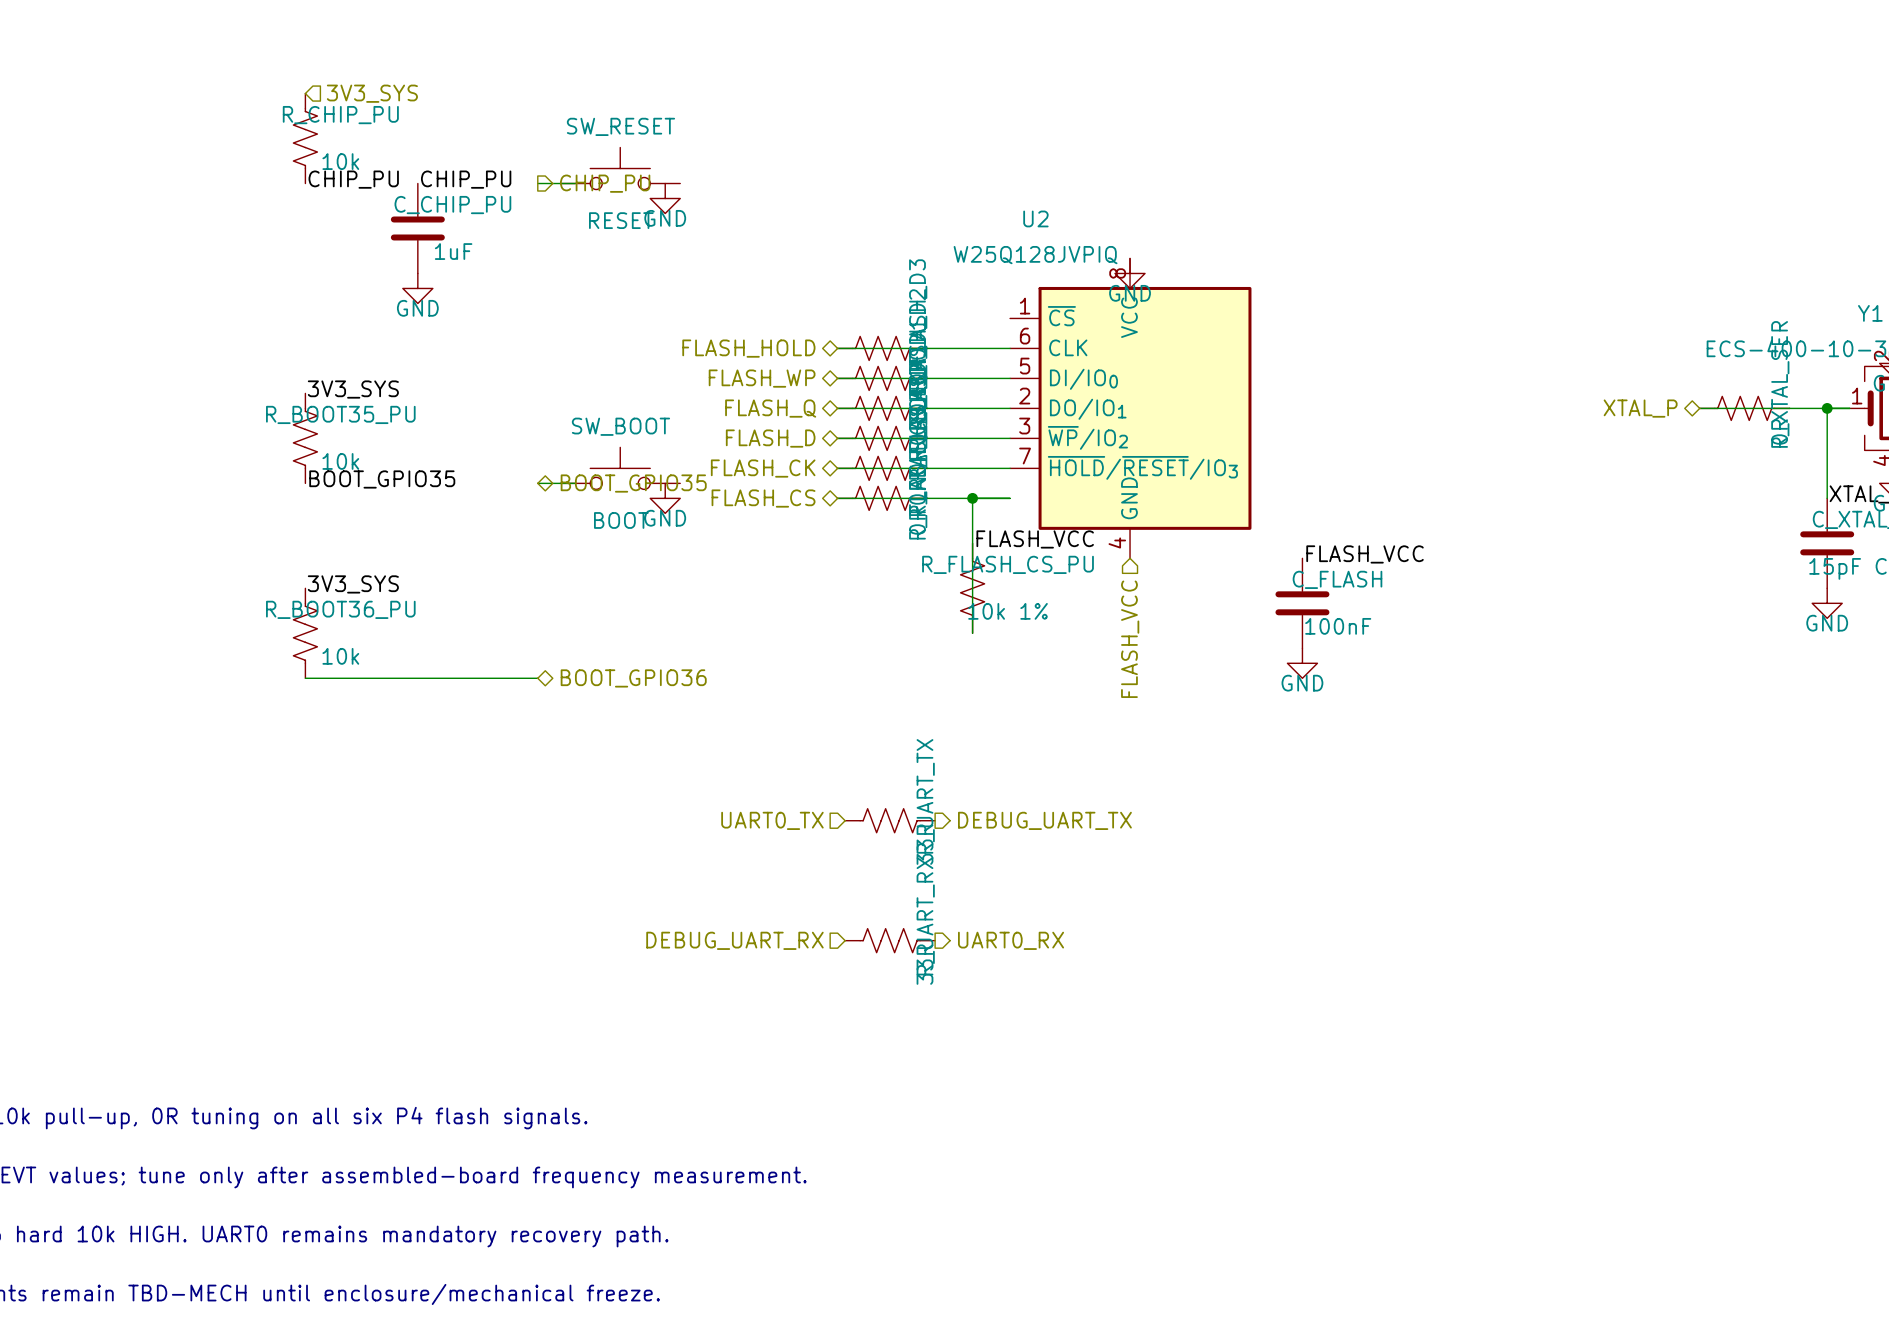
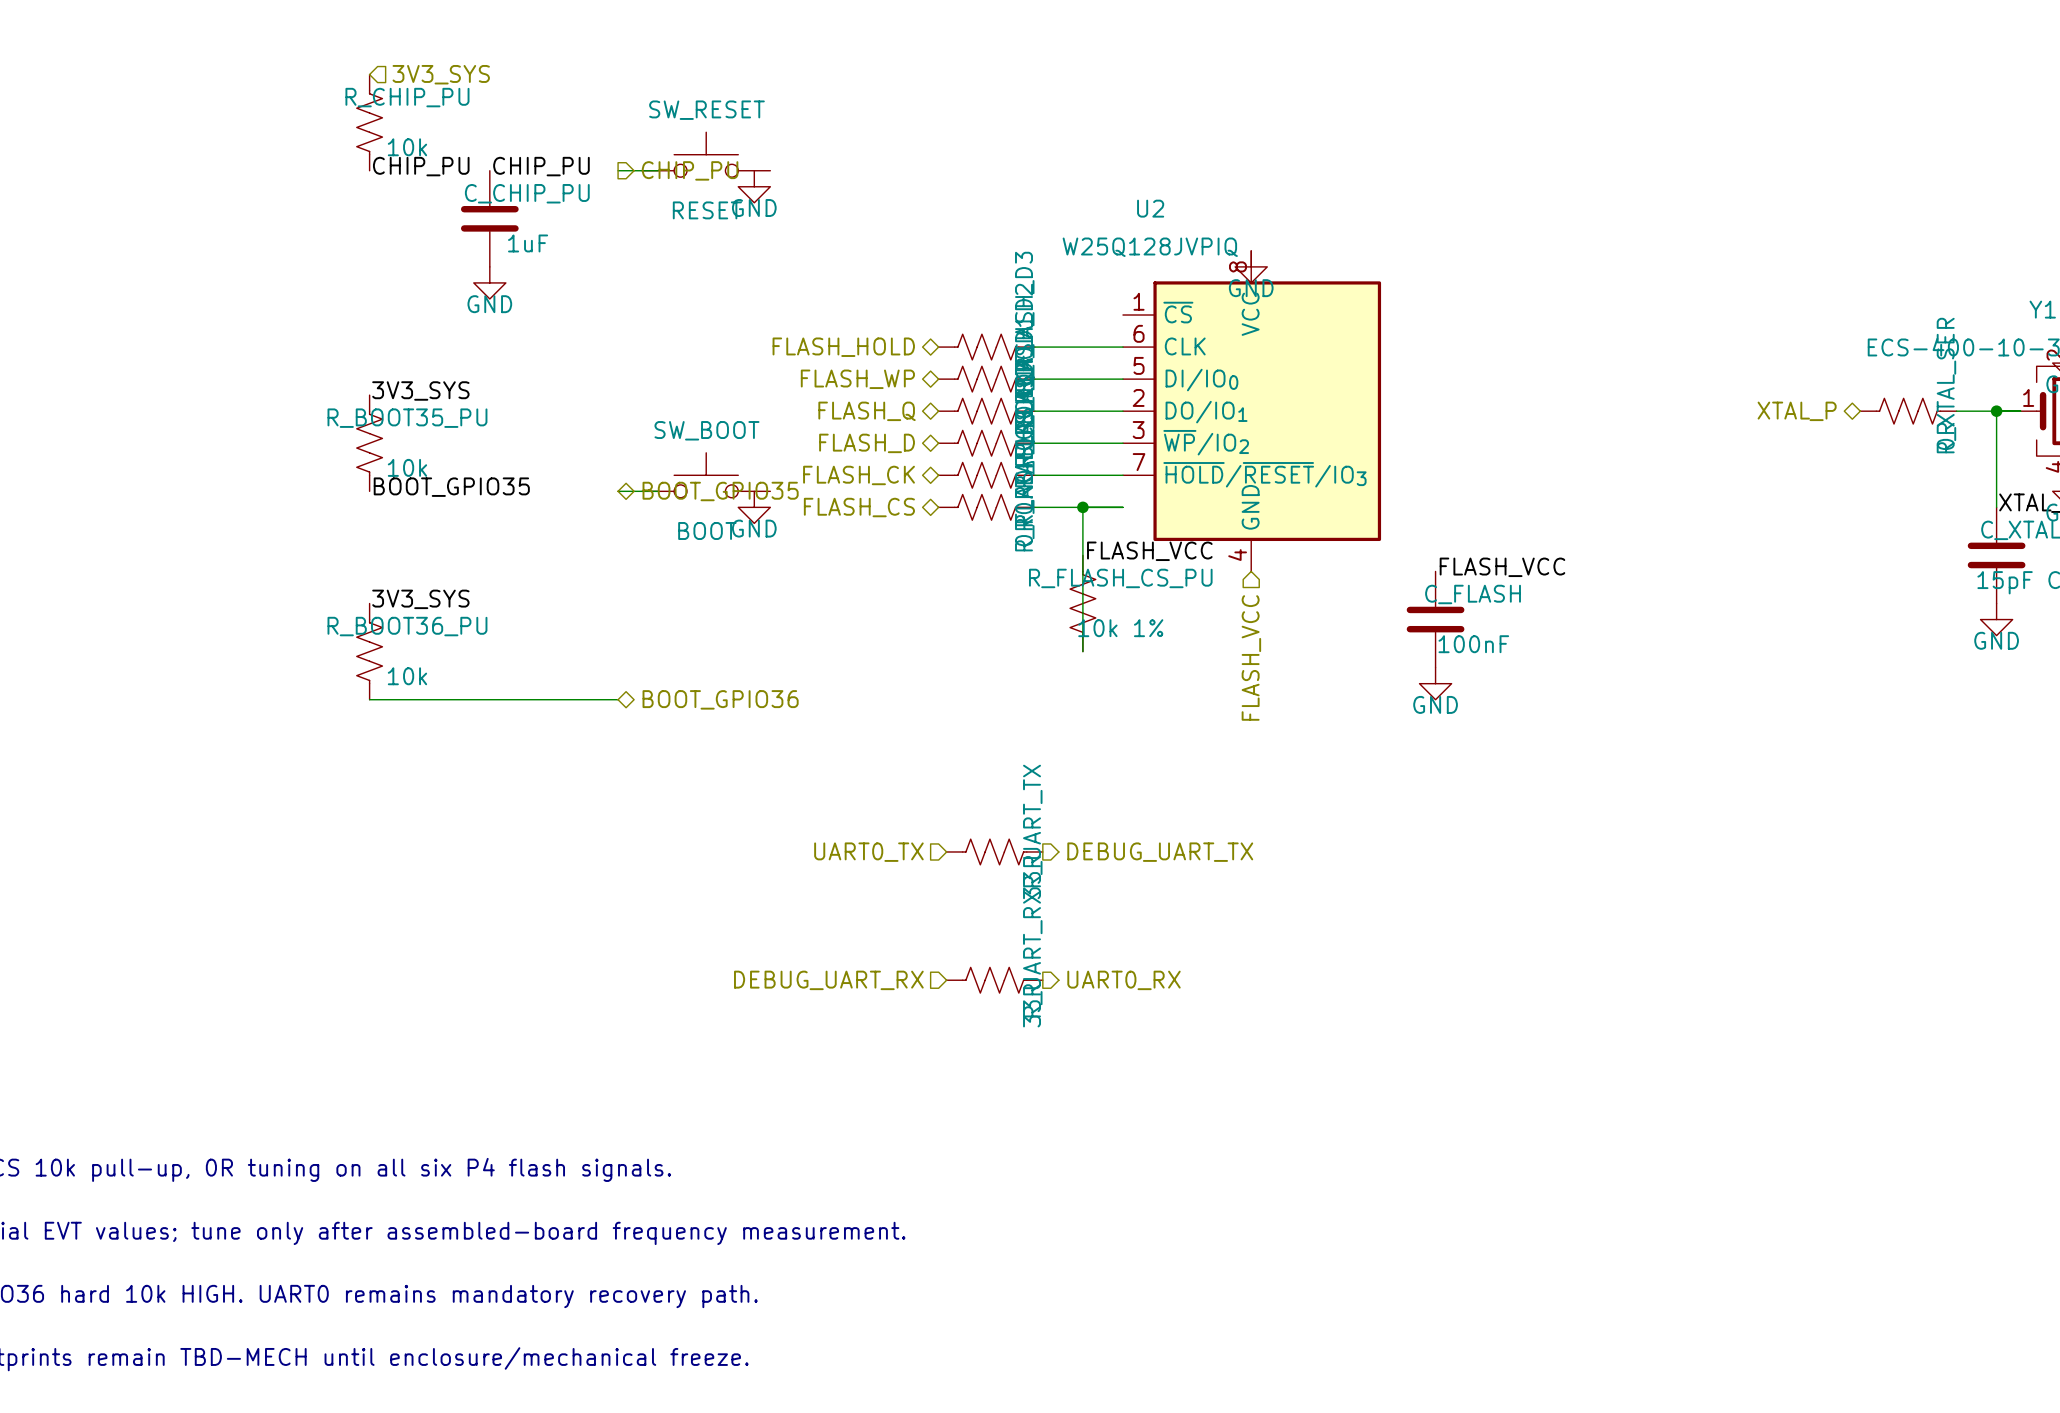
wire: (837, 348) (927, 348) -> none
wire: (837, 378) (927, 378) -> none
wire: (837, 408) (927, 408) -> none
wire: (1699, 408) (1789, 408) -> none
wire: (837, 438) (927, 438) -> none
wire: (837, 468) (927, 468) -> none
wire: (837, 498) (927, 498) -> none

